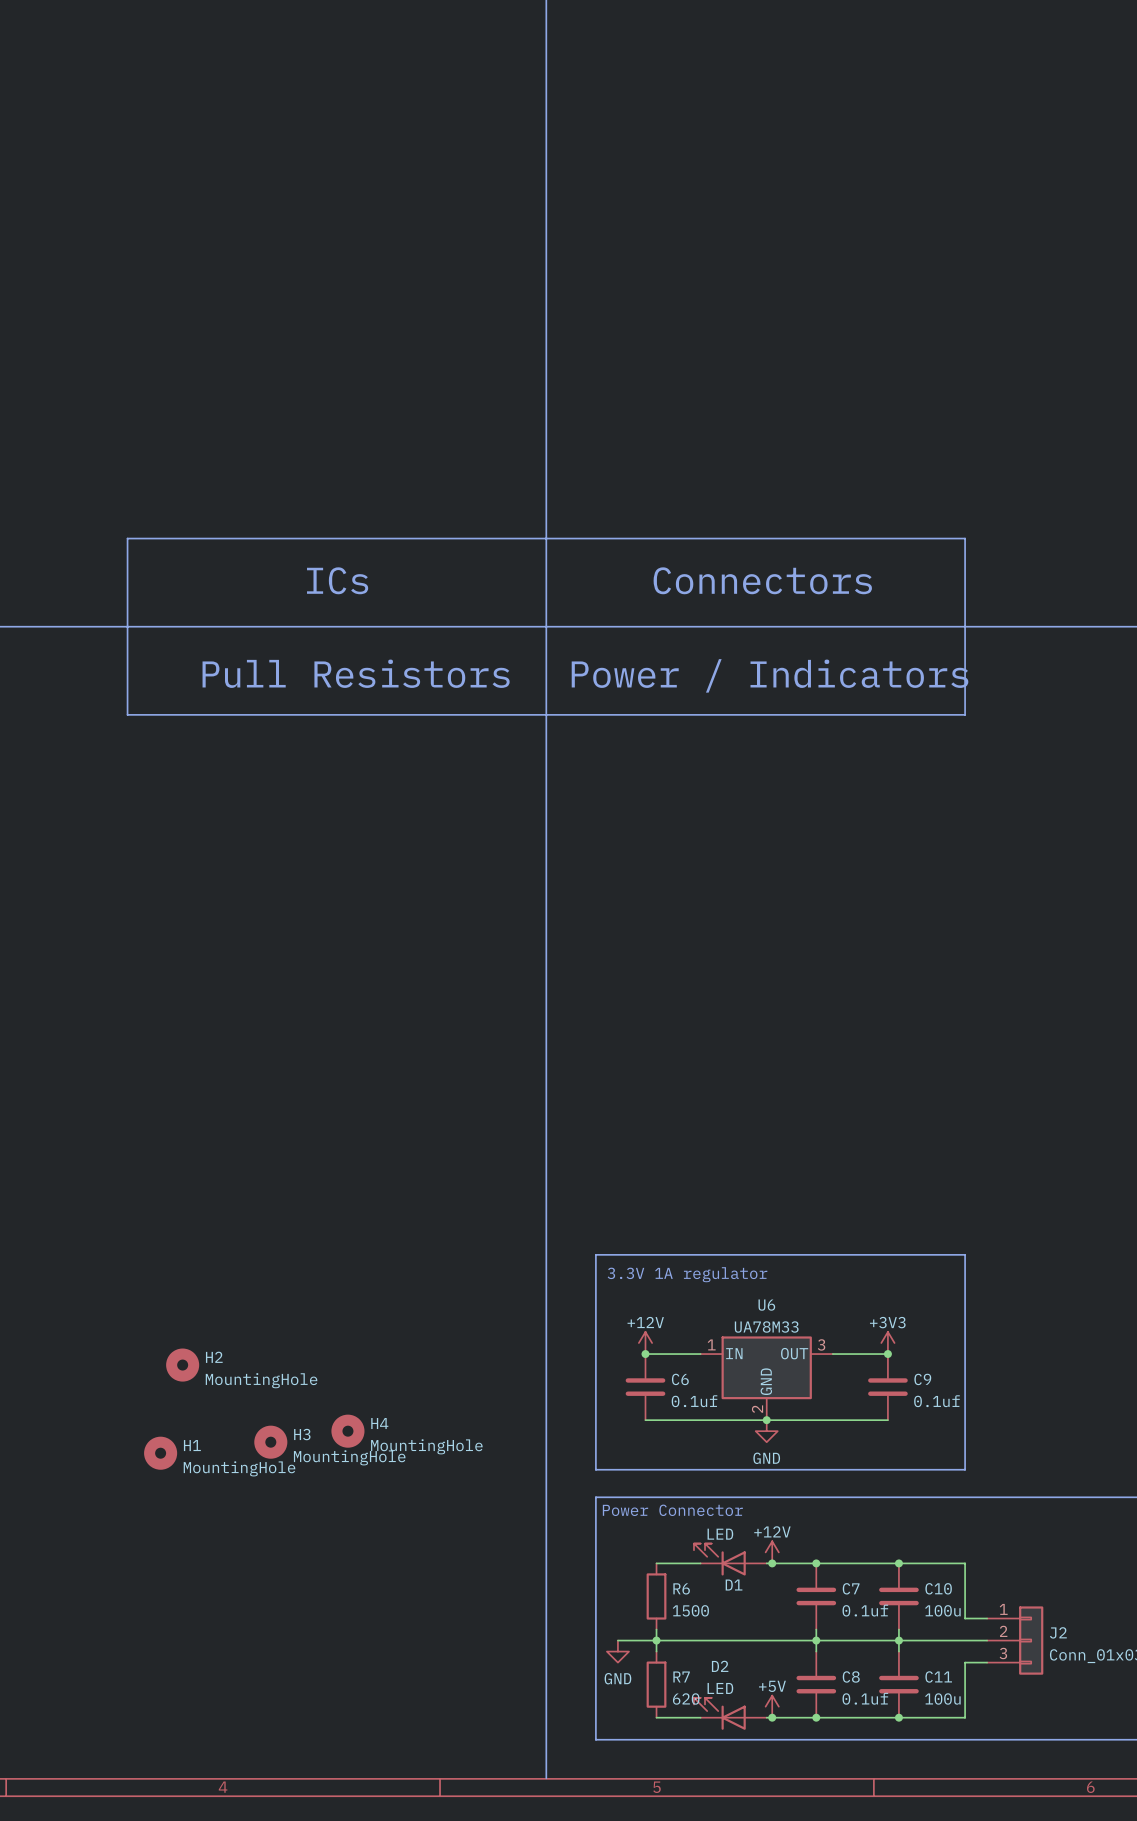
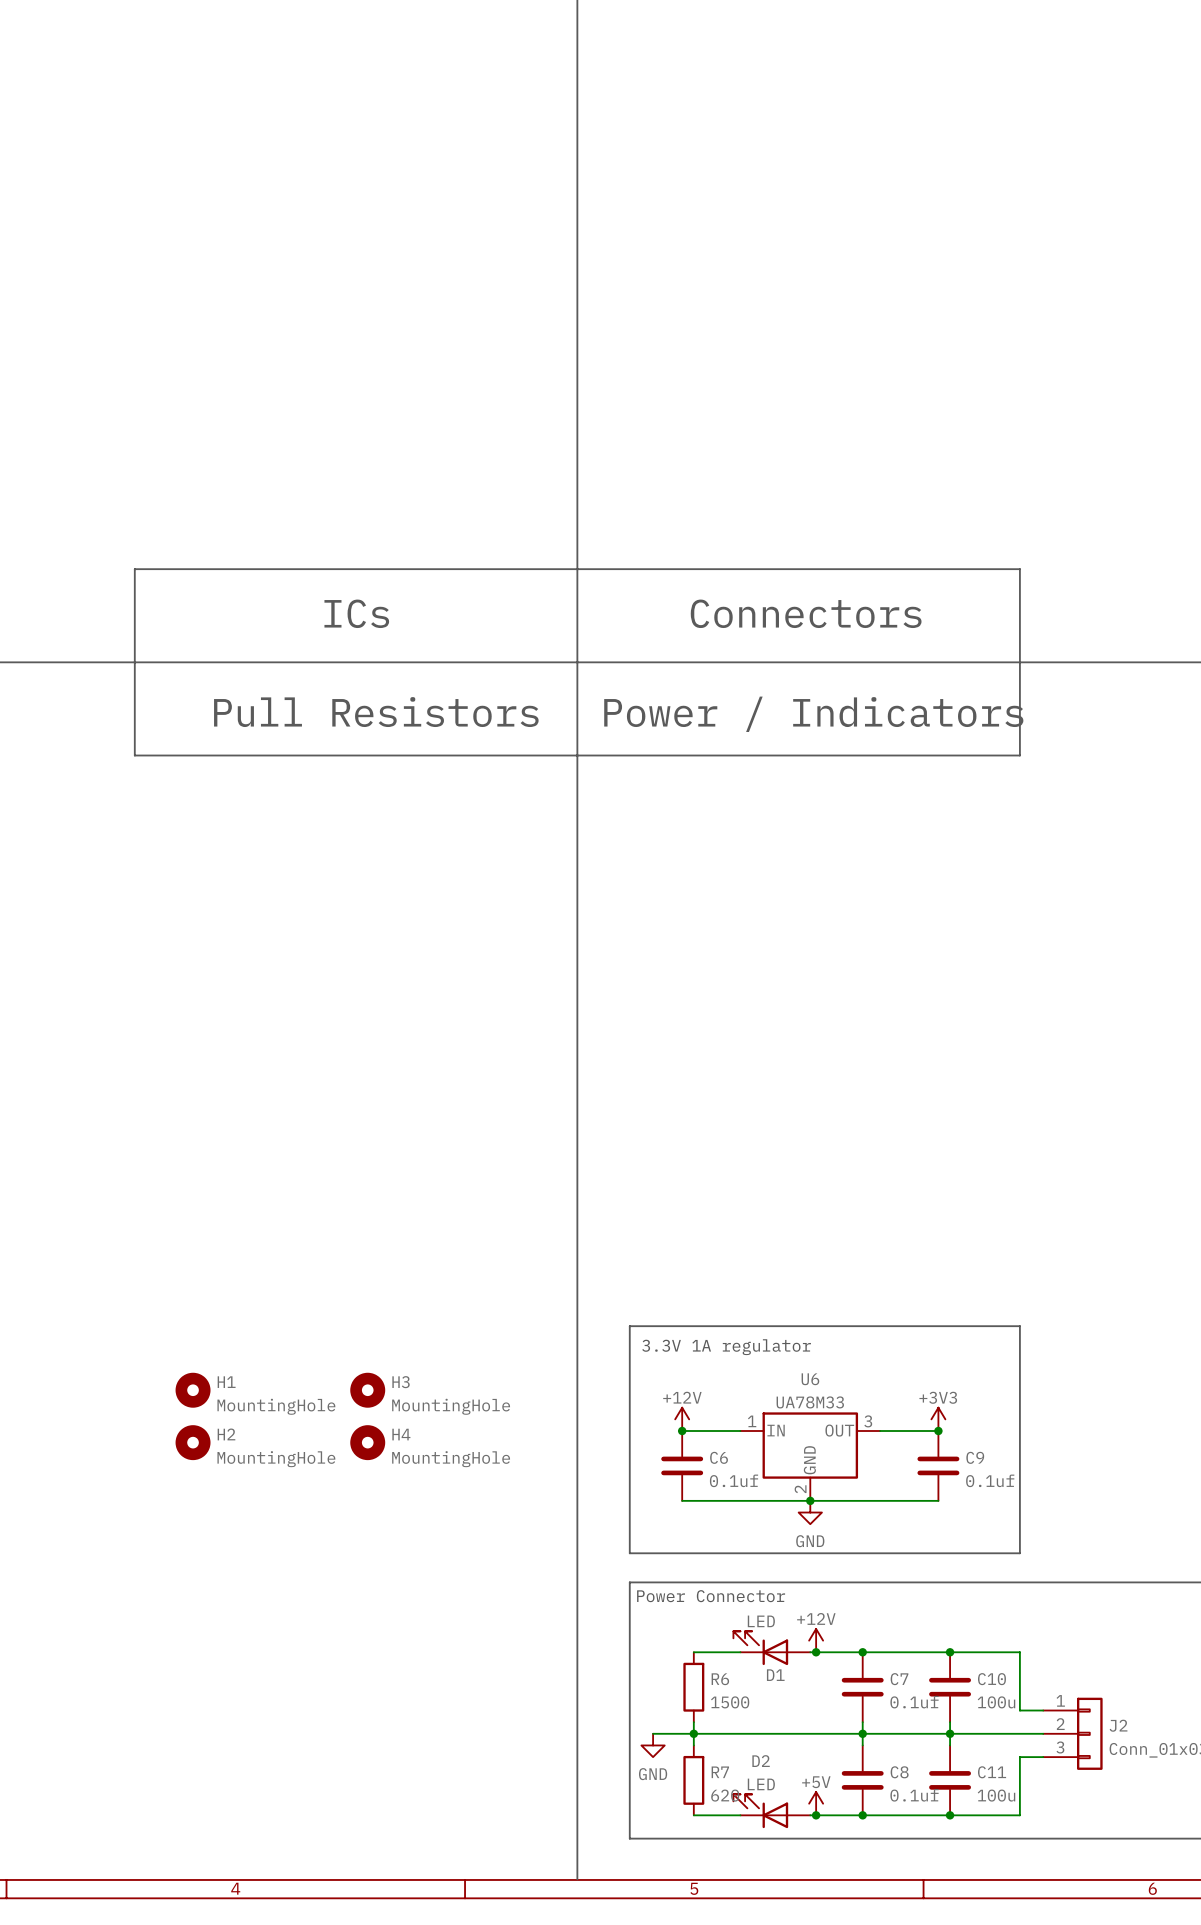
H4 position: (347, 1431) -> (367, 1442)
H3 position: (270, 1442) -> (367, 1390)
H1 position: (160, 1453) -> (193, 1390)

